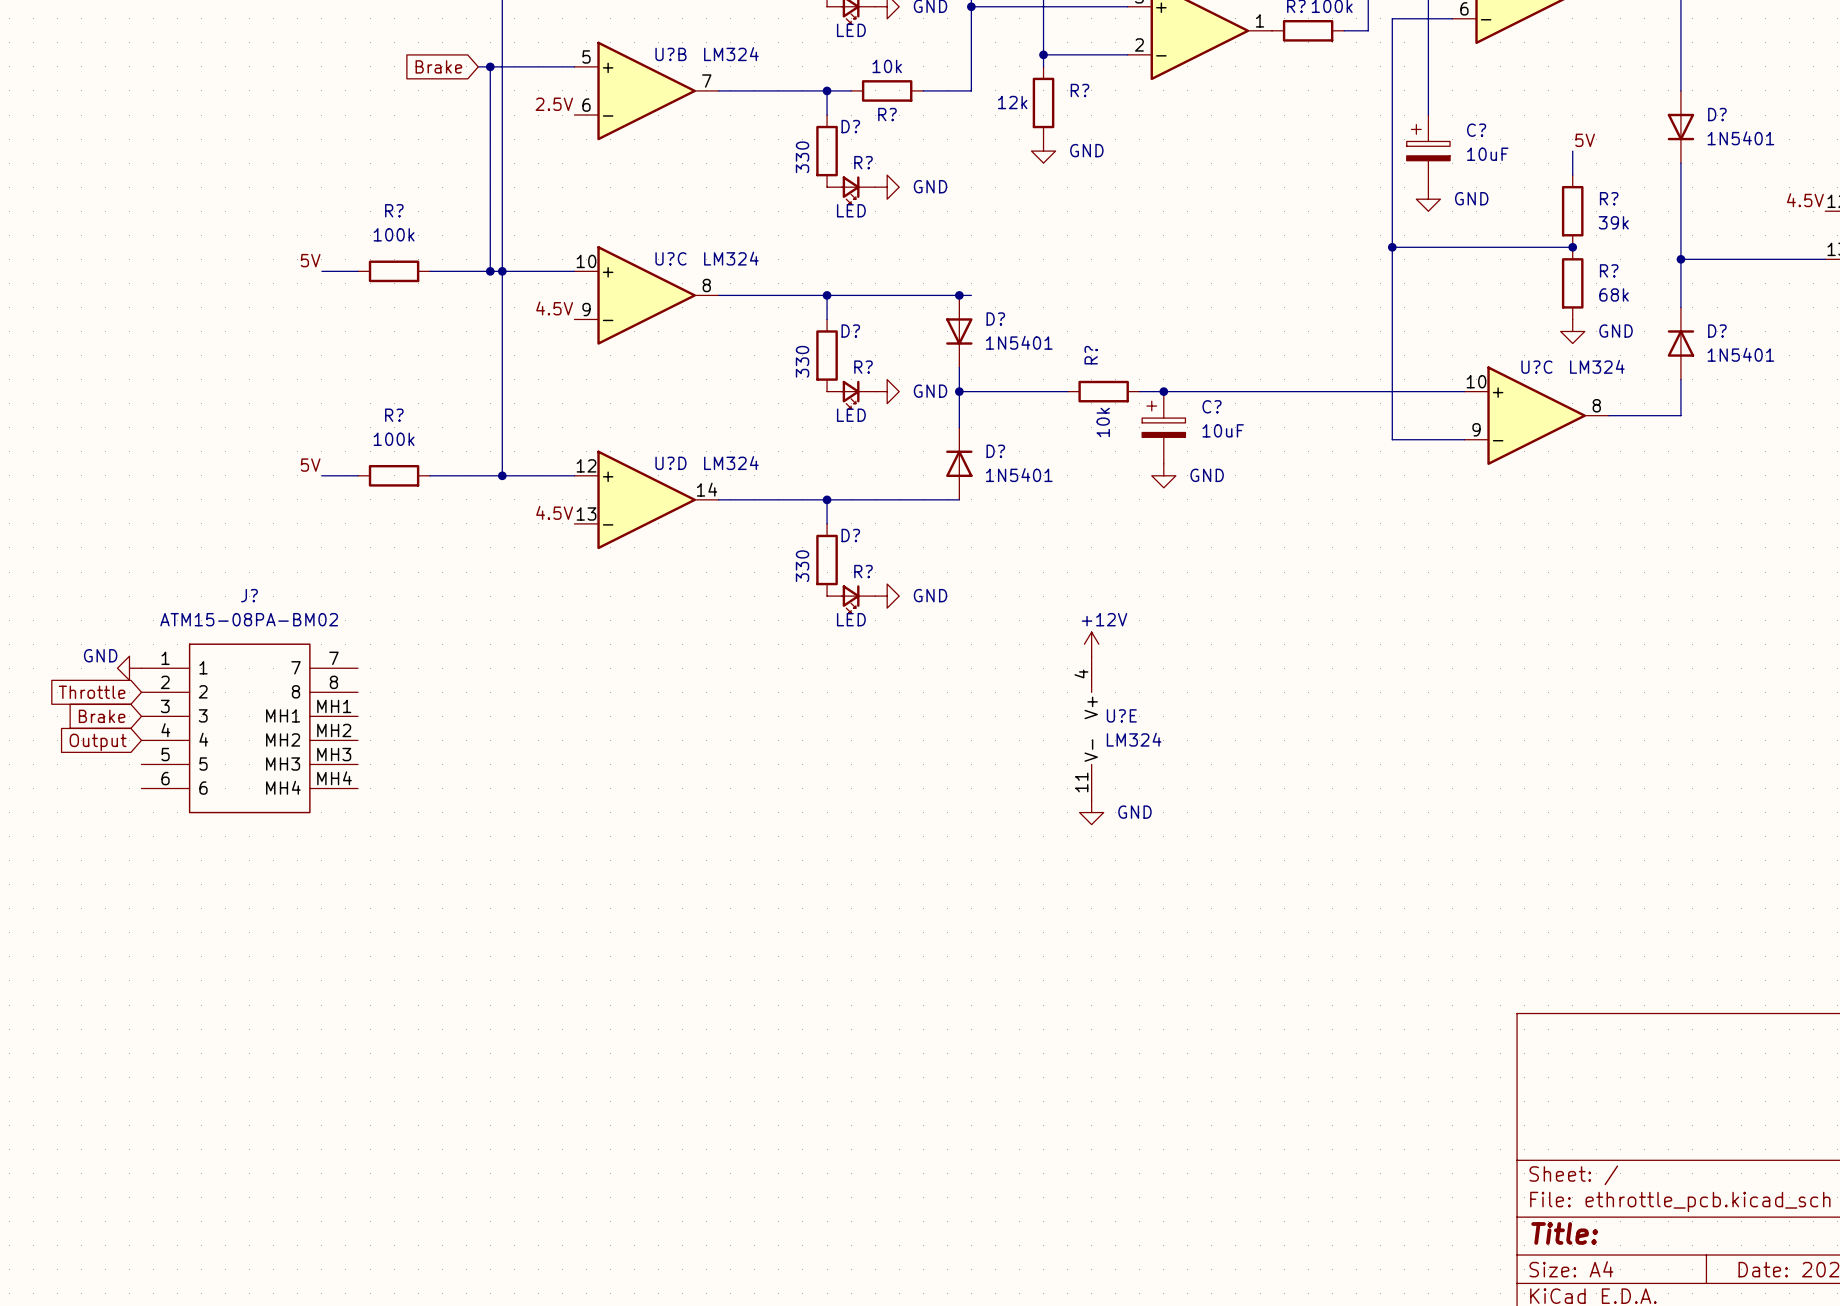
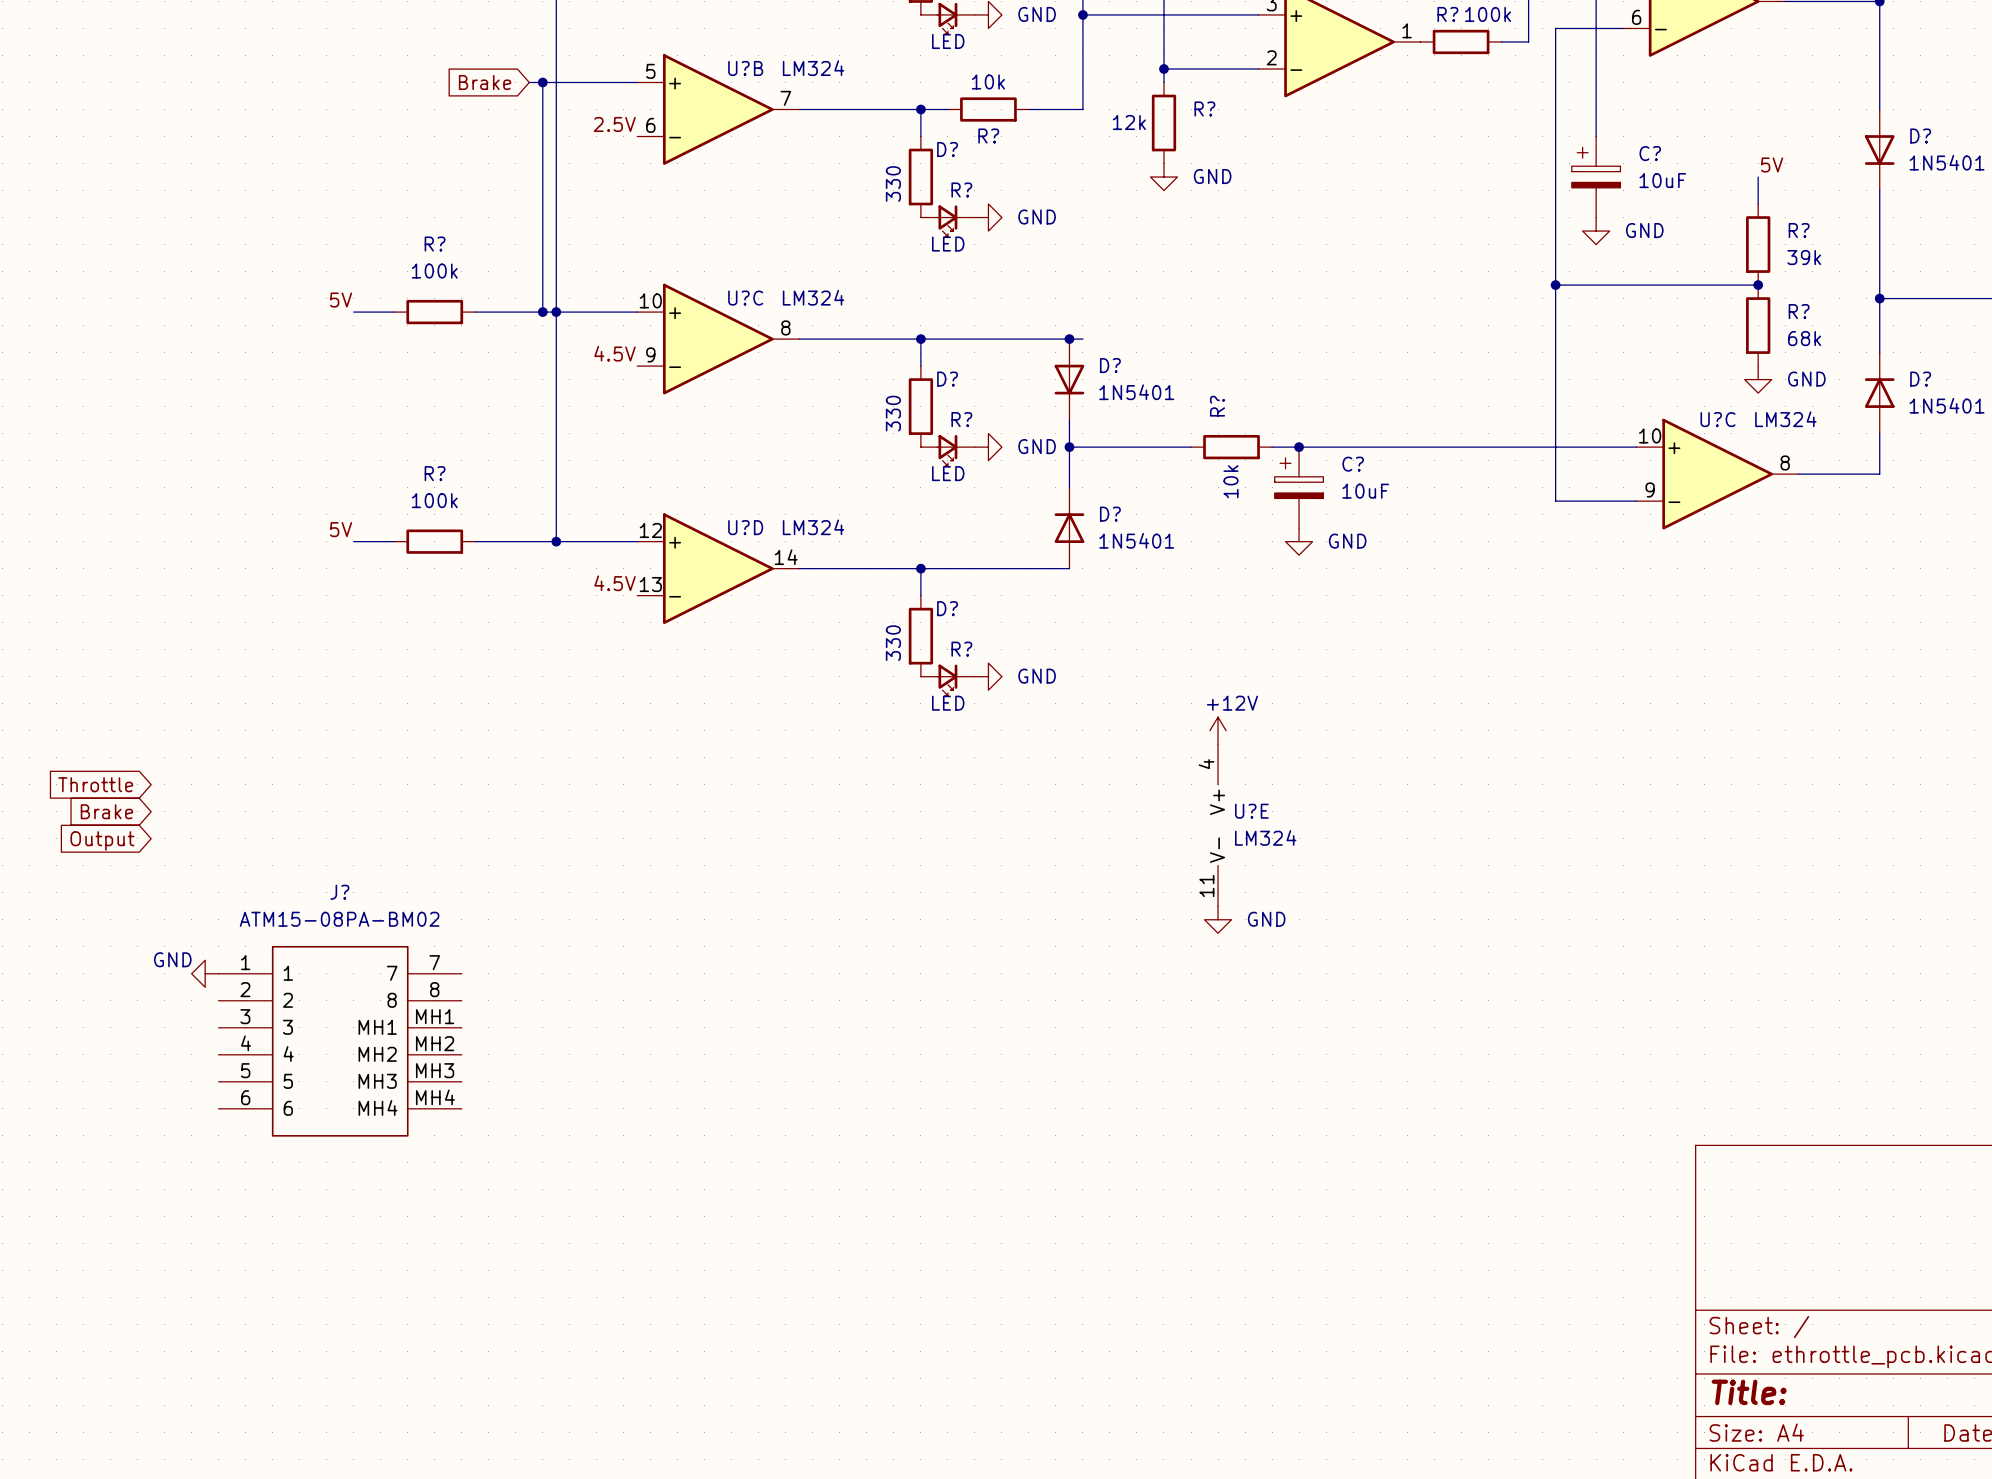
power symbol position: GND (129, 668) -> GND (205, 973)
J? position: (249, 728) -> (340, 1041)

